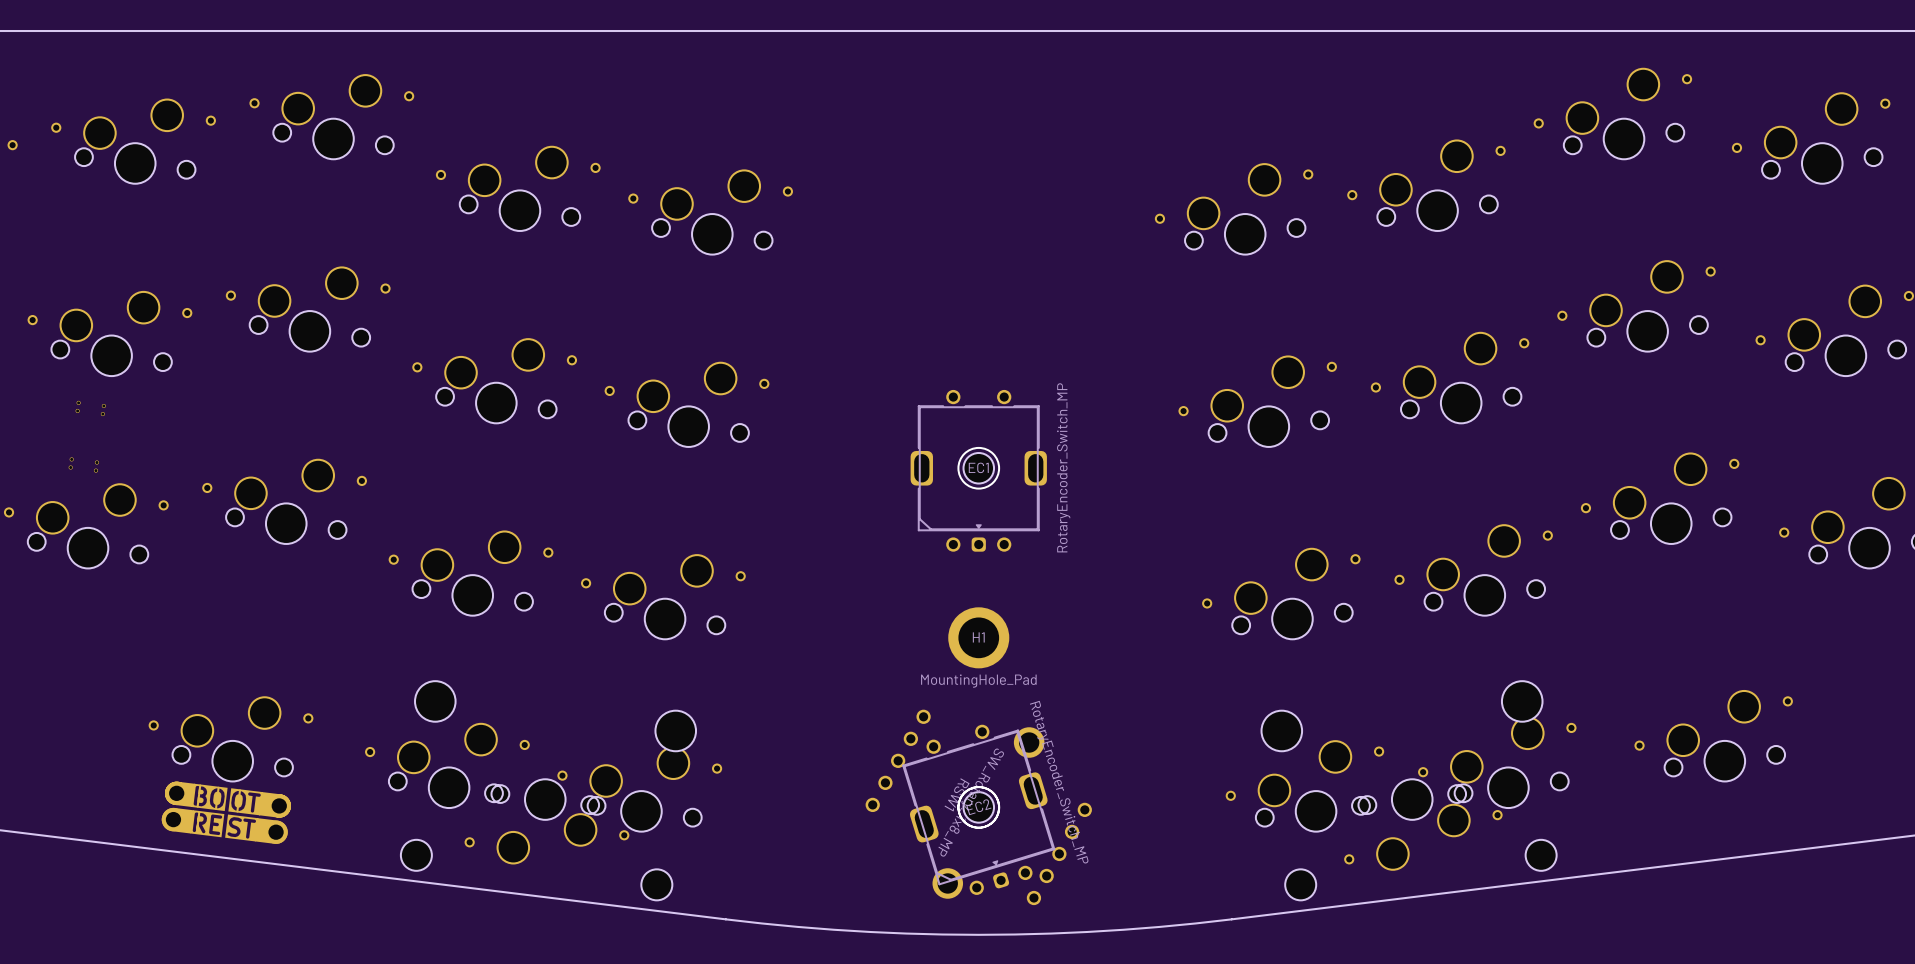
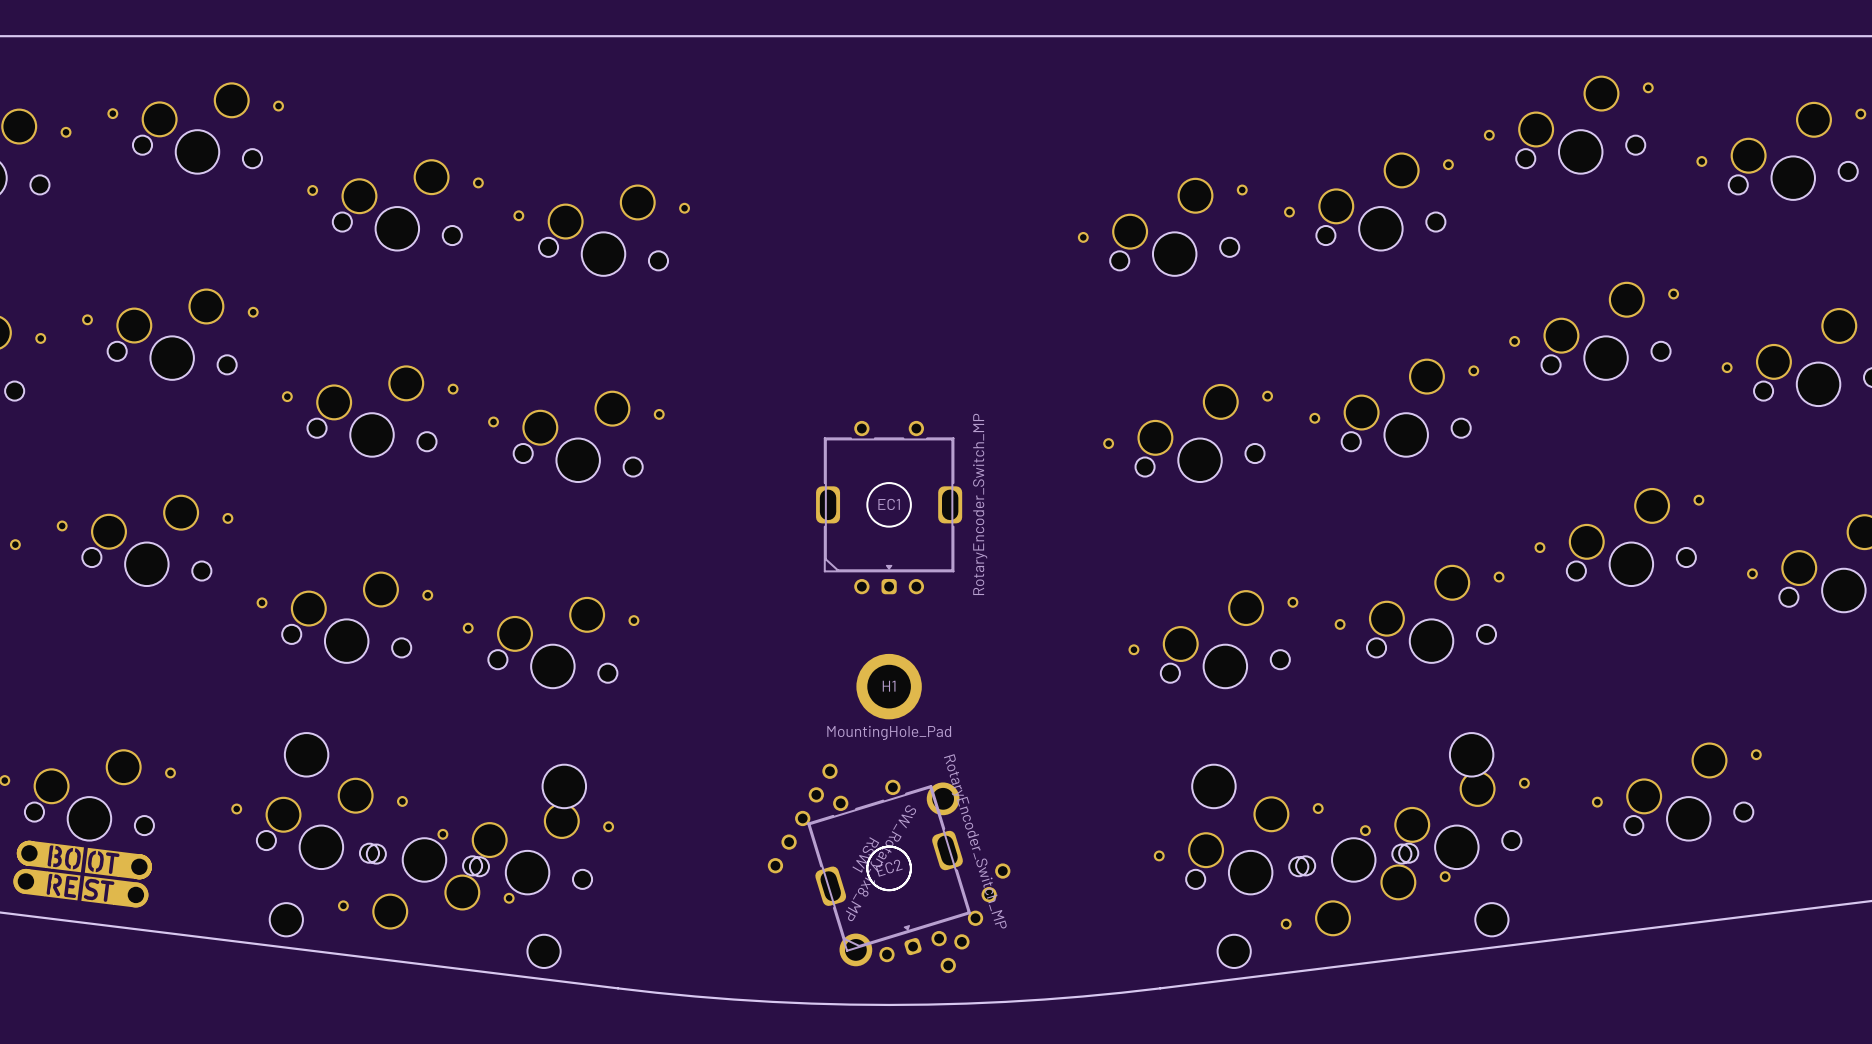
part: (978, 468) -> none
part: (978, 807) -> none

